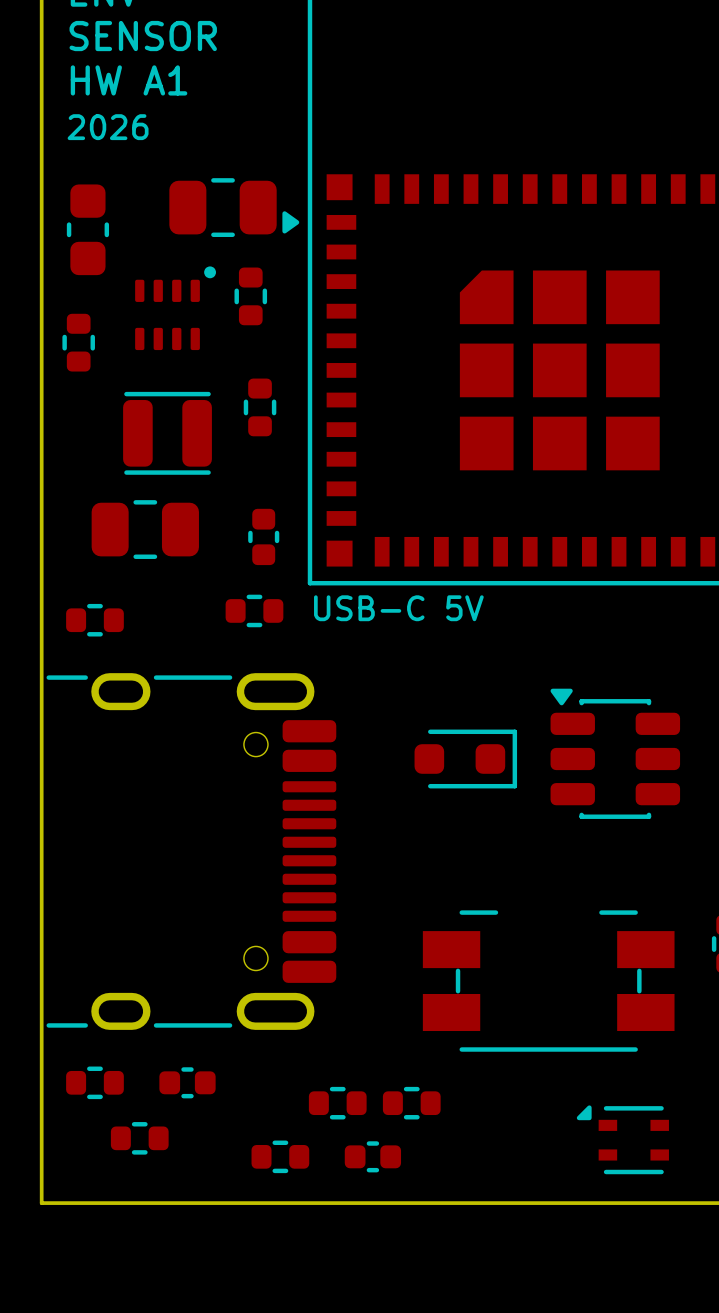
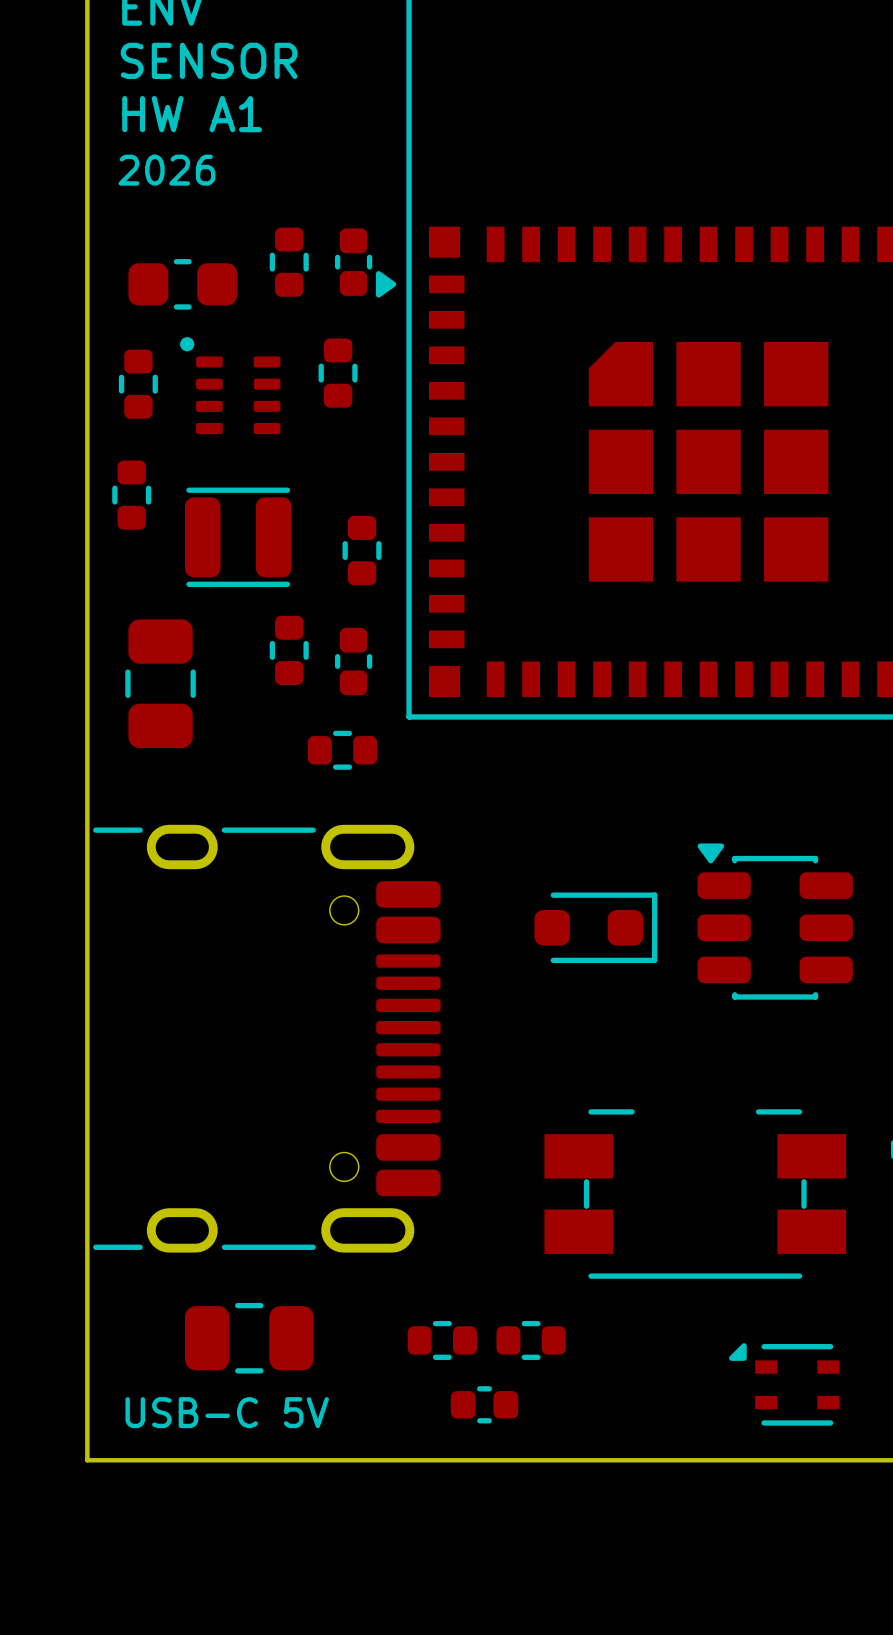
part footprint: [169, 178, 277, 238] -> [269, 227, 309, 297]
part: none -> (353, 262)
part rotation: 0° (87, 229) -> 90° clockwise (182, 284)
part: none -> (138, 384)
part rotation: 0° (175, 308) -> 90° counterclockwise (230, 385)
part: (78, 342) -> none
part: none -> (131, 495)
part position: (260, 407) -> (362, 550)
part: none -> (289, 650)
part rotation: 0° (145, 529) -> 90° clockwise (160, 683)
text position: USB-C 5V (398, 608) -> USB-C 5V (227, 1412)
part: (94, 620) -> none
part footprint: [159, 1067, 216, 1099] -> [184, 1302, 314, 1374]
part: (94, 1082) -> none
part: (139, 1138) -> none
part: (280, 1156) -> none

